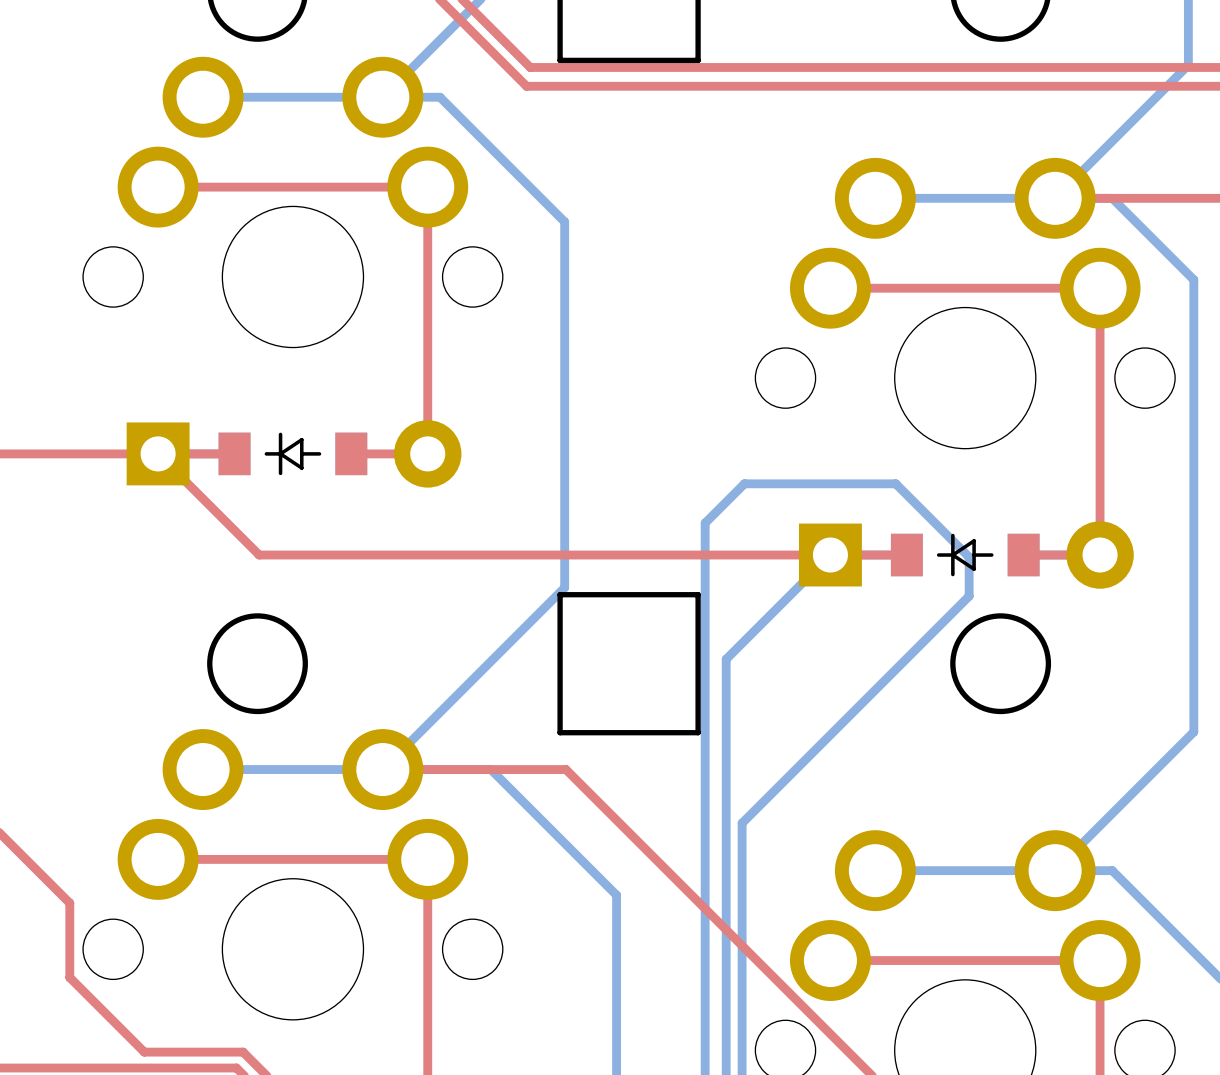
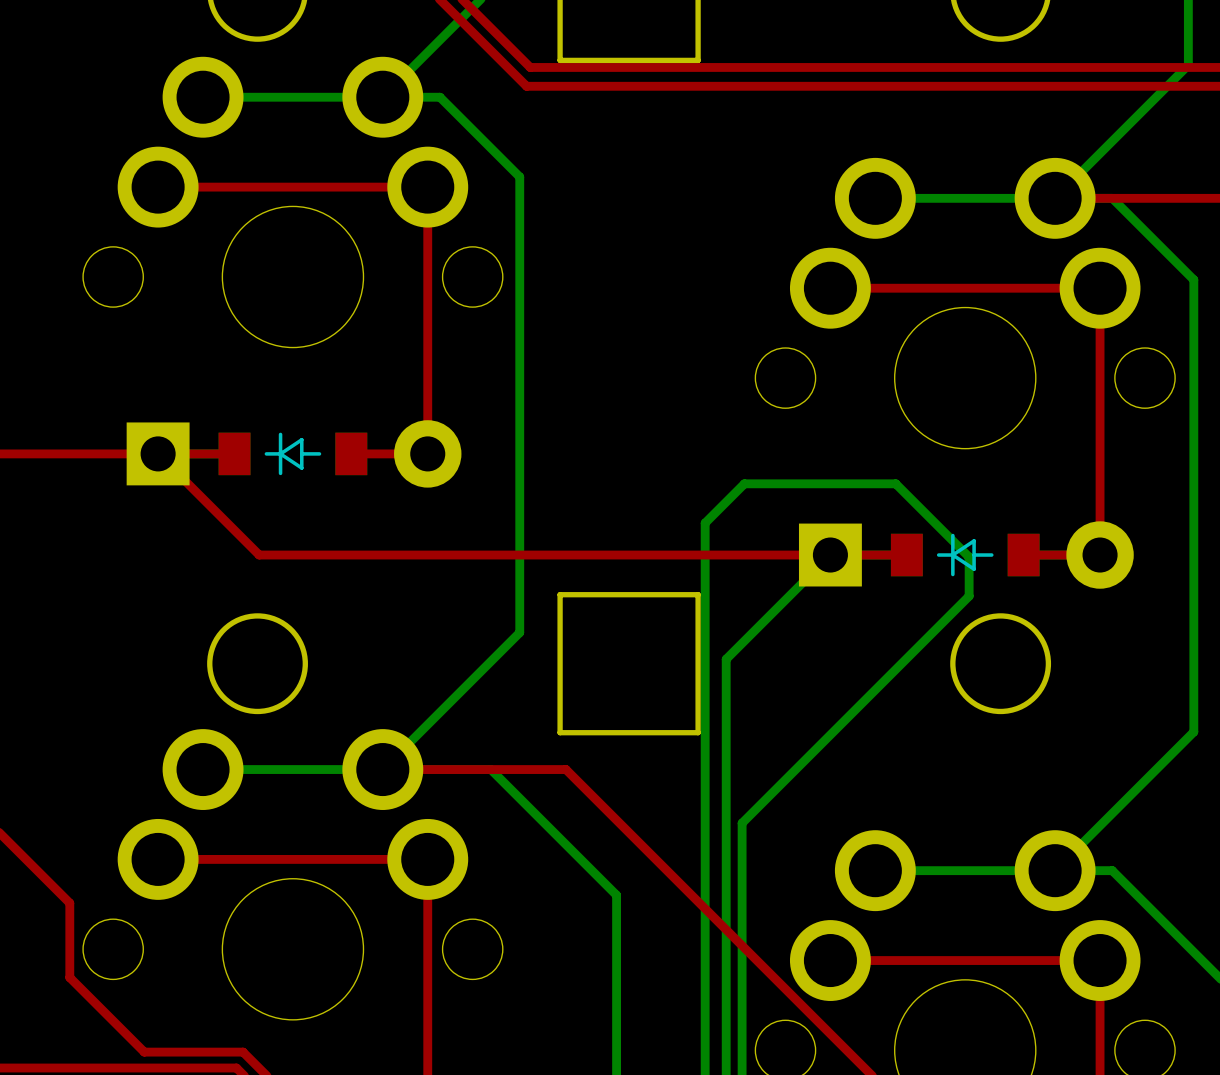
bottom track: (519, 176) (564, 221) (564, 587) (519, 632) -> (519, 176) (519, 632)

